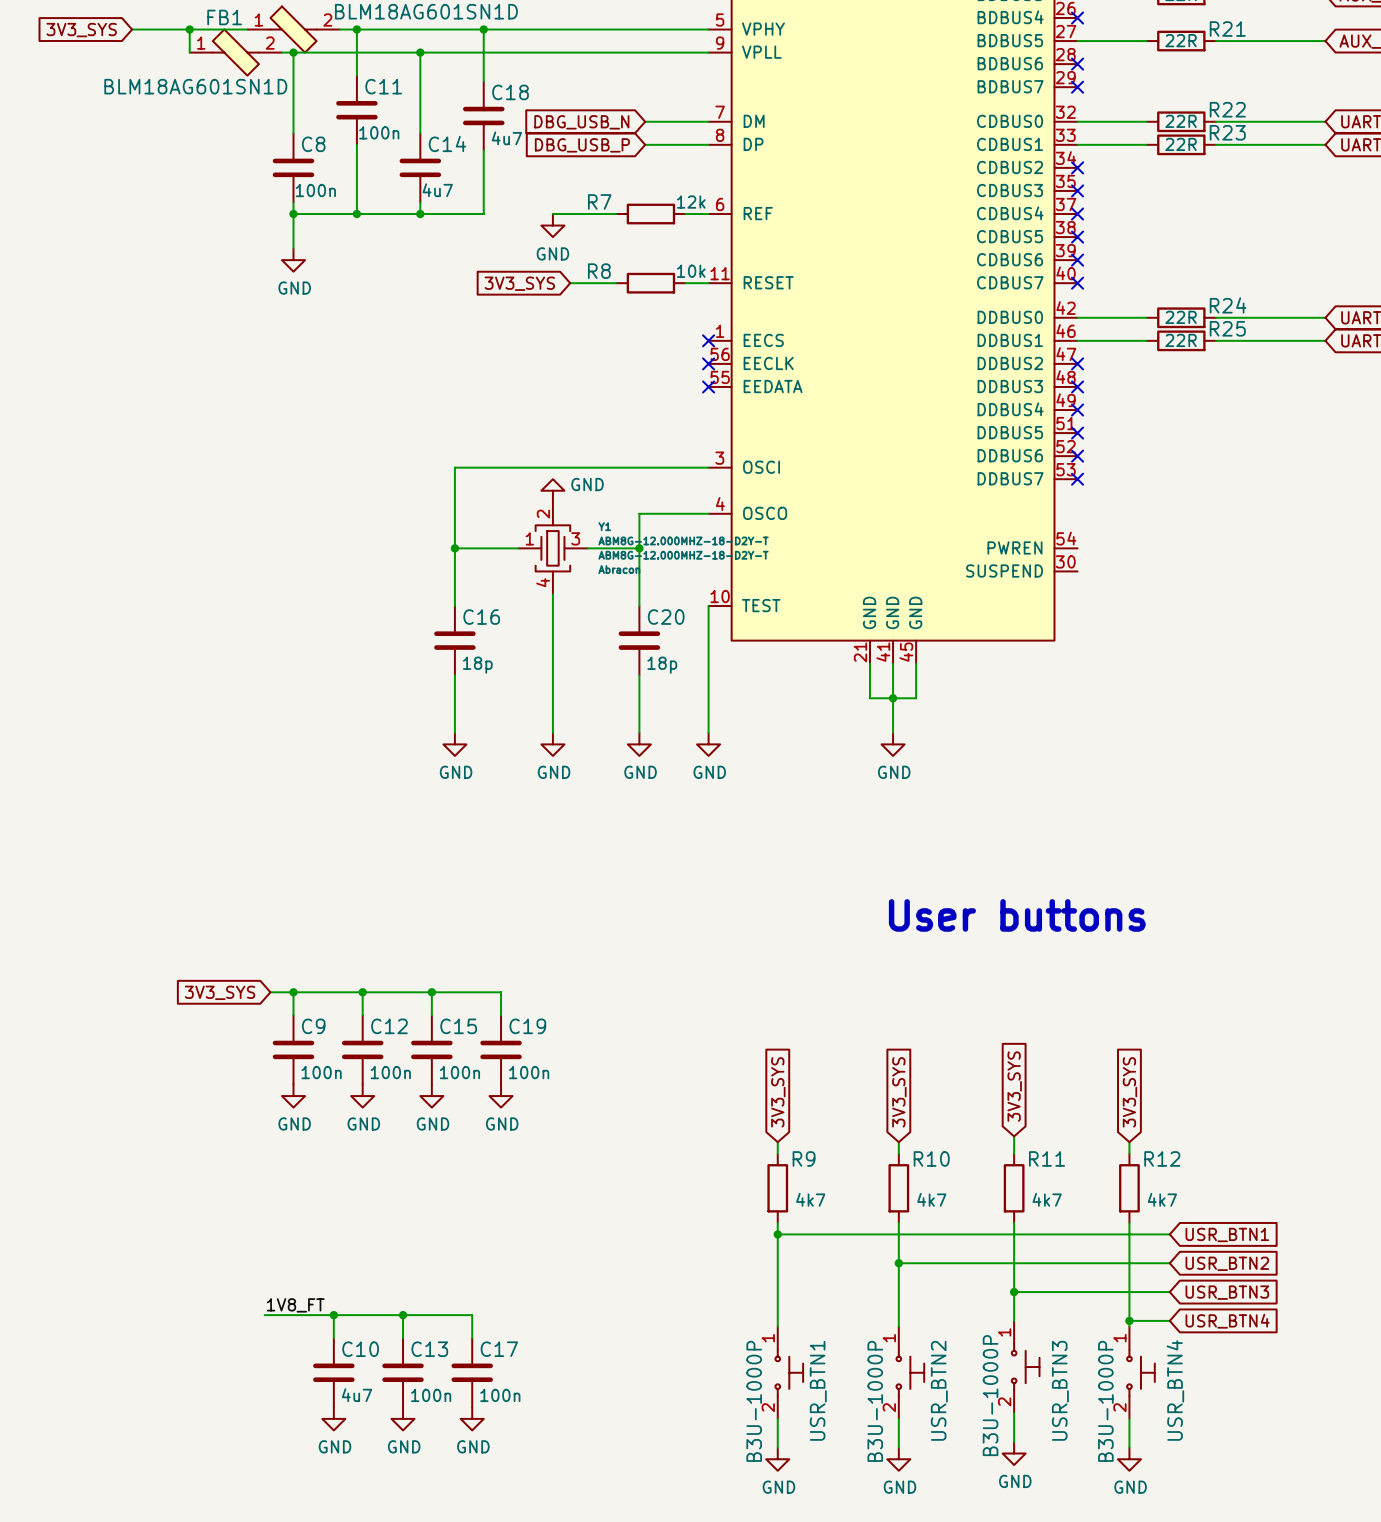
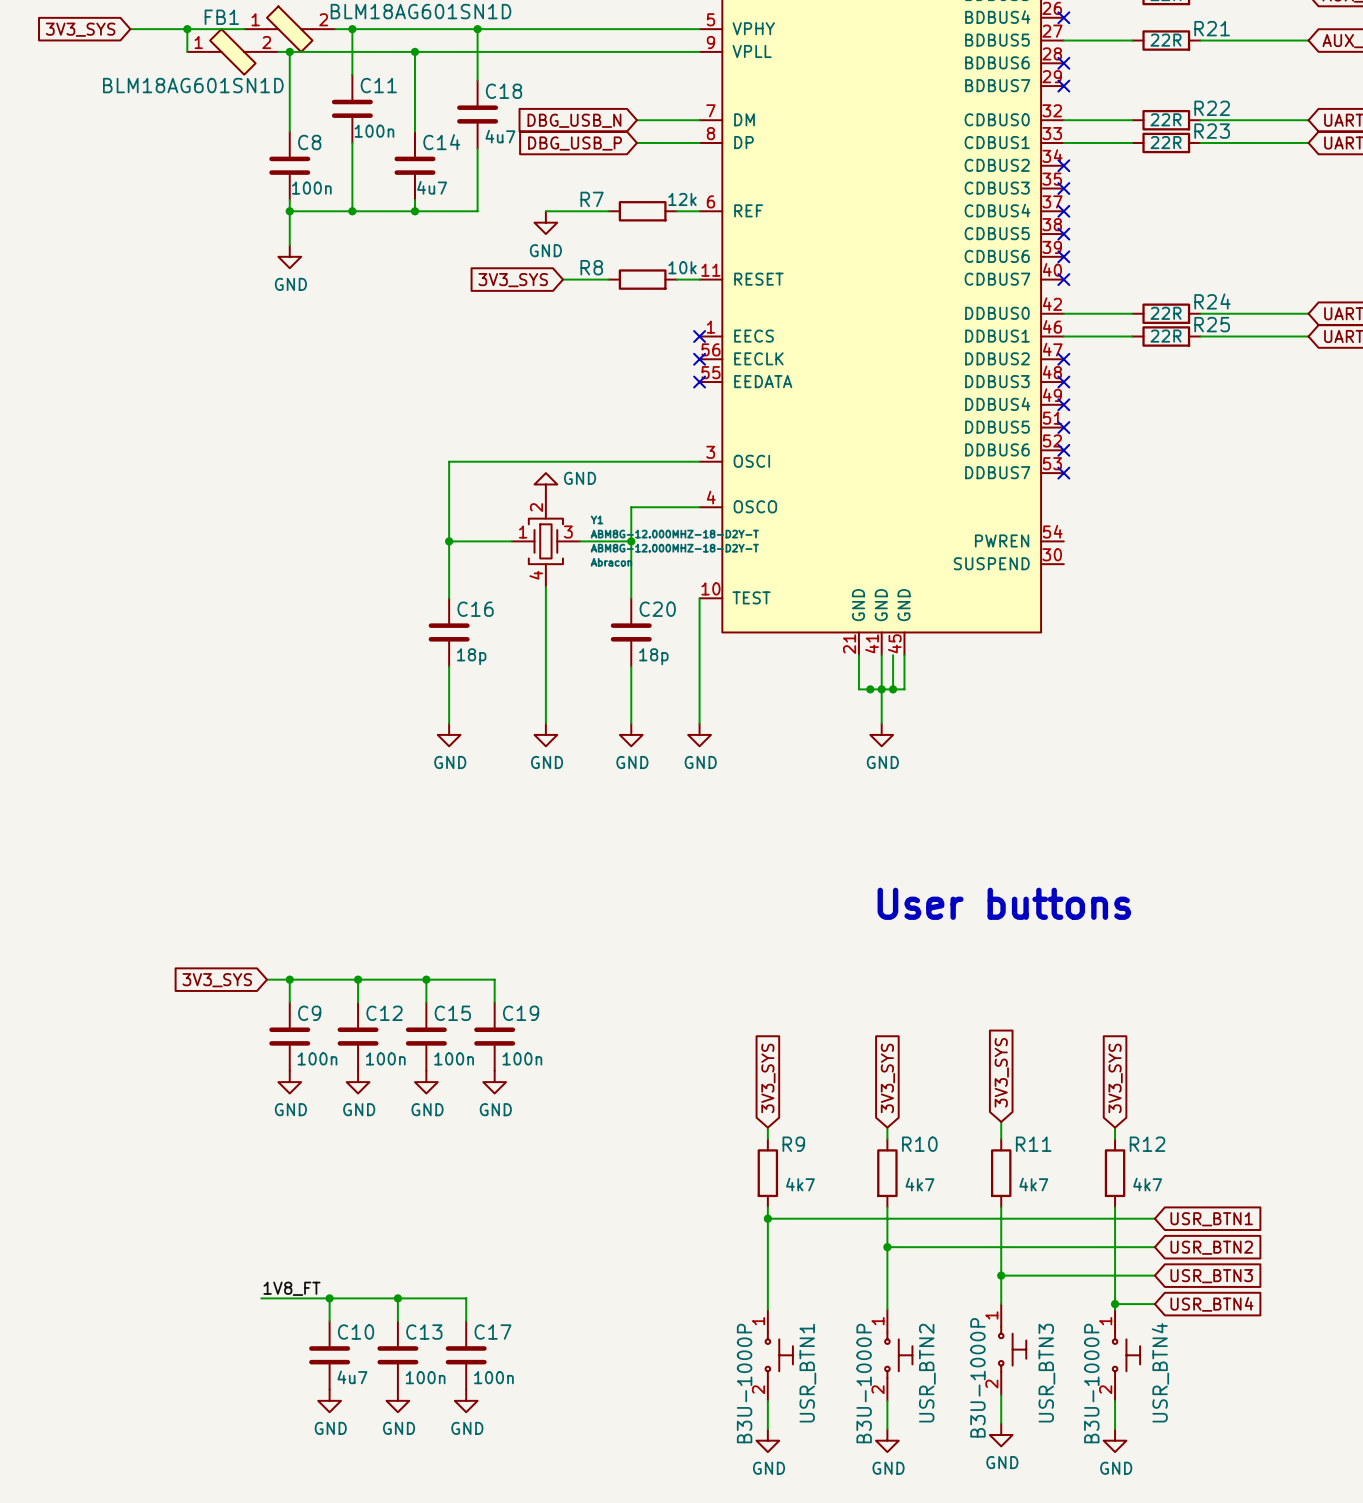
wire: none -> (893, 655) (893, 689)
junction: none -> (870, 689)
junction: none -> (893, 689)

